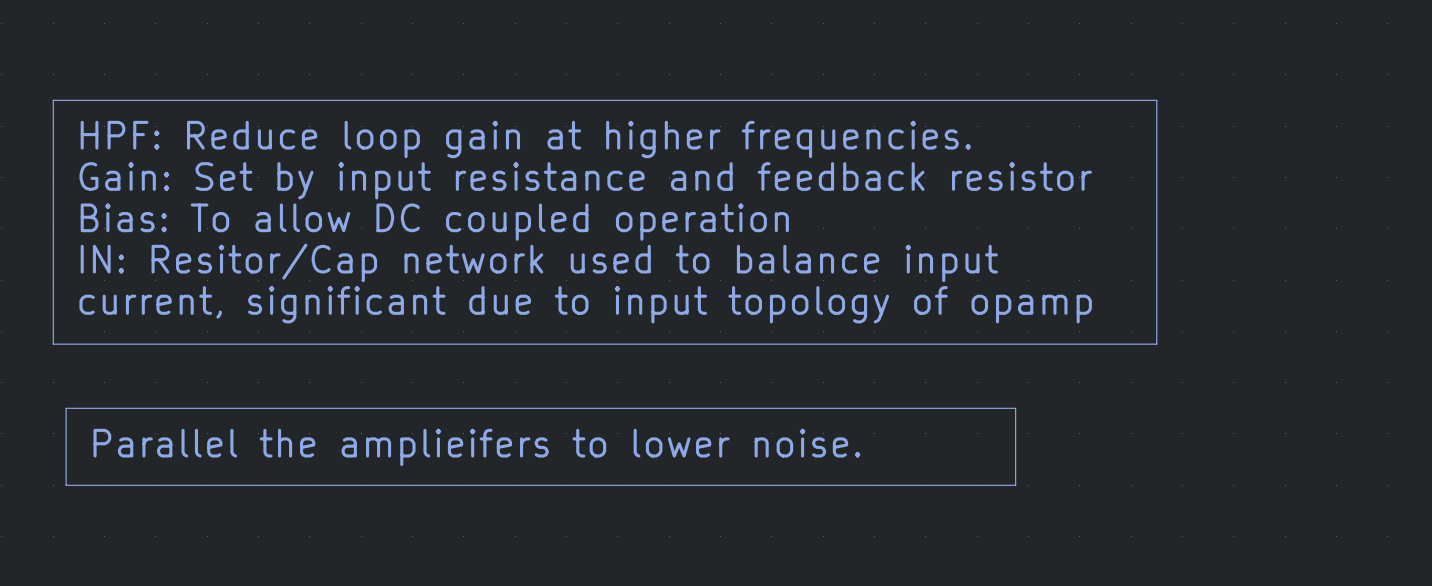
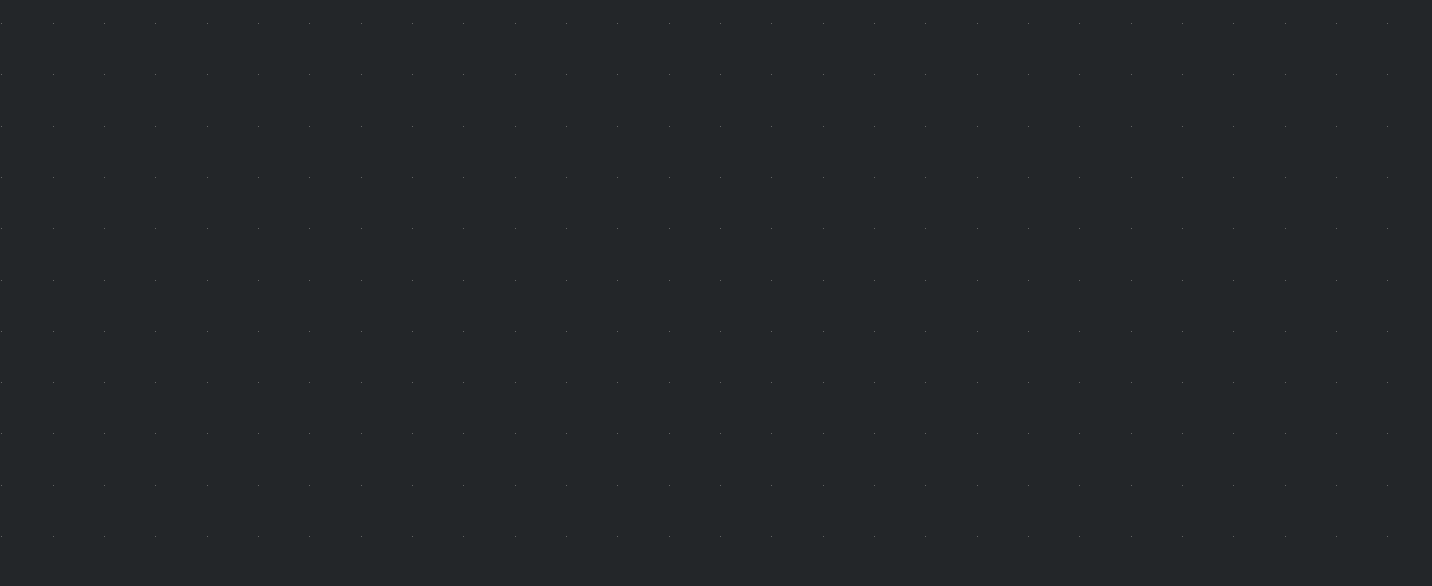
line: (53, 100) (1156, 100) (1156, 344) (53, 344) (53, 100) -> none
text: HPF: Reduce loop gain at higher frequencies. (525, 139) -> none
text: Gain: Set by input resistance and feedback resistor (585, 180) -> none
text: Bias: To allow DC coupled operation (434, 222) -> none
text: IN: Resitor/Cap network used to balance input (539, 262) -> none
text: current, significant due to input topology of opamp (585, 304) -> none
line: (66, 408) (1015, 408) (1015, 485) (66, 485) (66, 408) -> none
text: Parallel the amplieifers to lower noise. (476, 447) -> none

